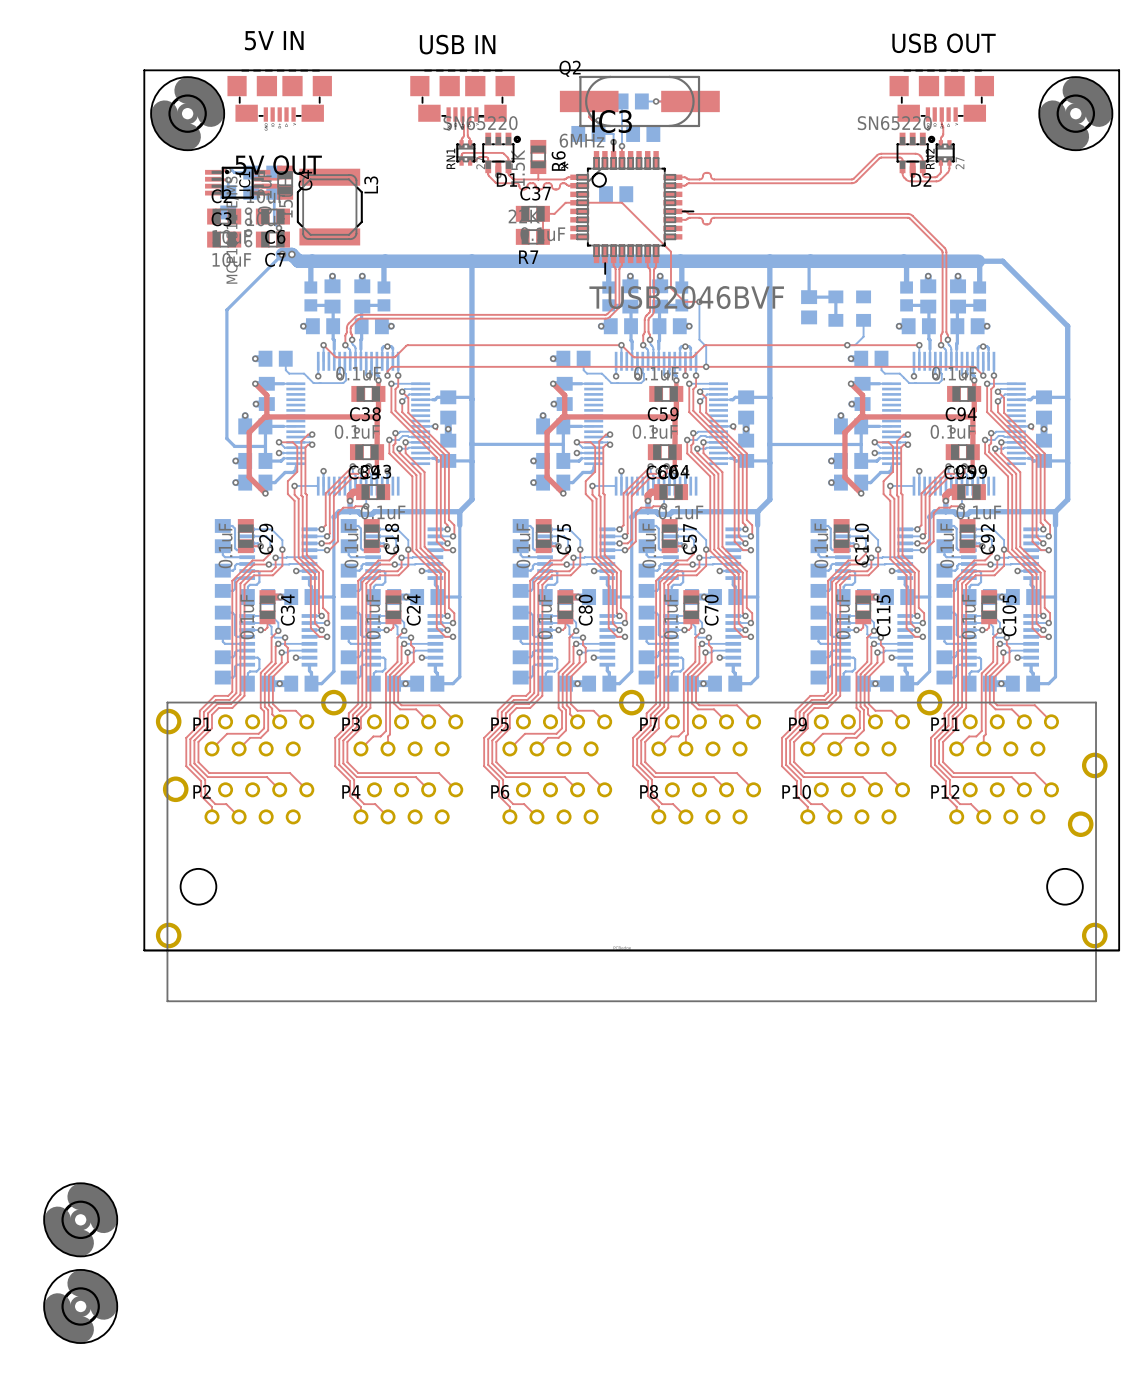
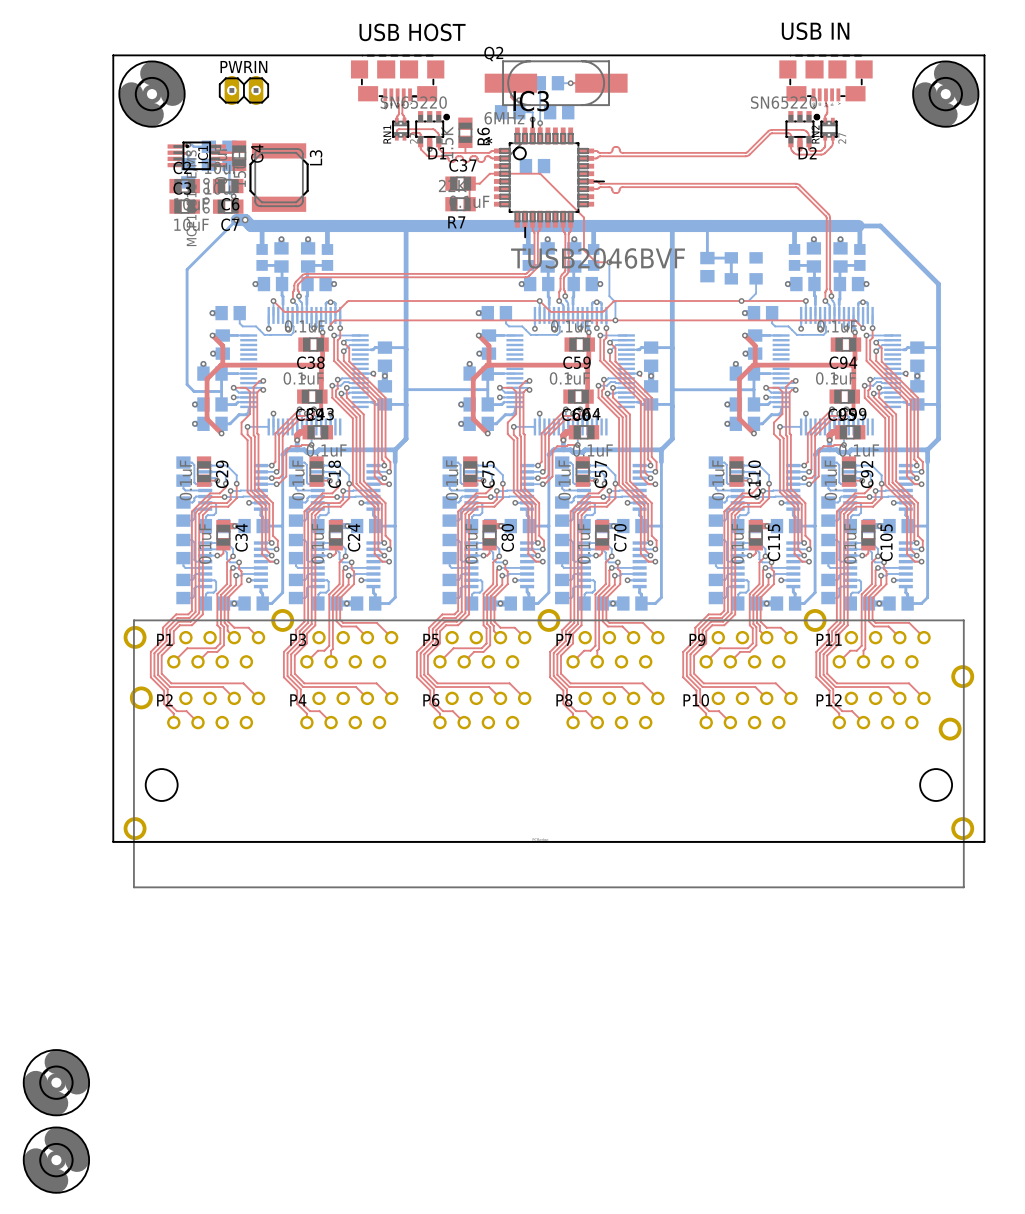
text: 5V IN (274, 40) -> none
text: USB OUT (944, 43) -> USB IN (815, 31)
text: USB IN (457, 44) -> USB HOST (412, 32)
part: (279, 95) -> none
PWRIN: none -> (243, 90)
text: 5V OUT (278, 165) -> none

